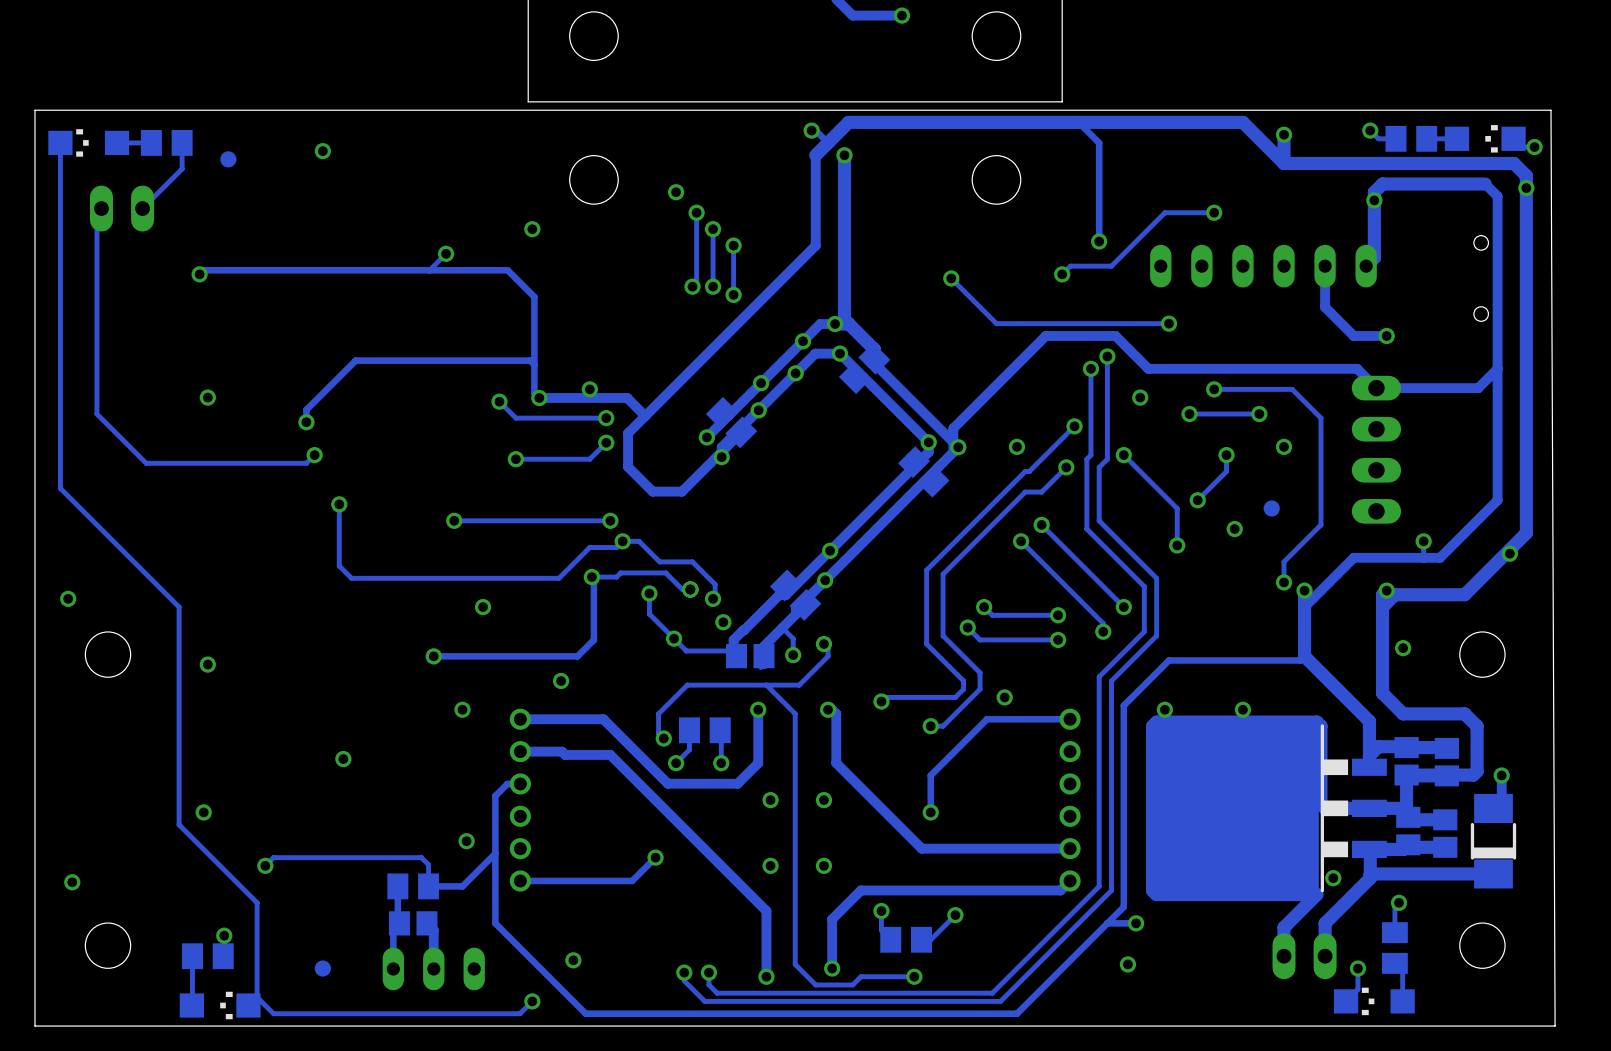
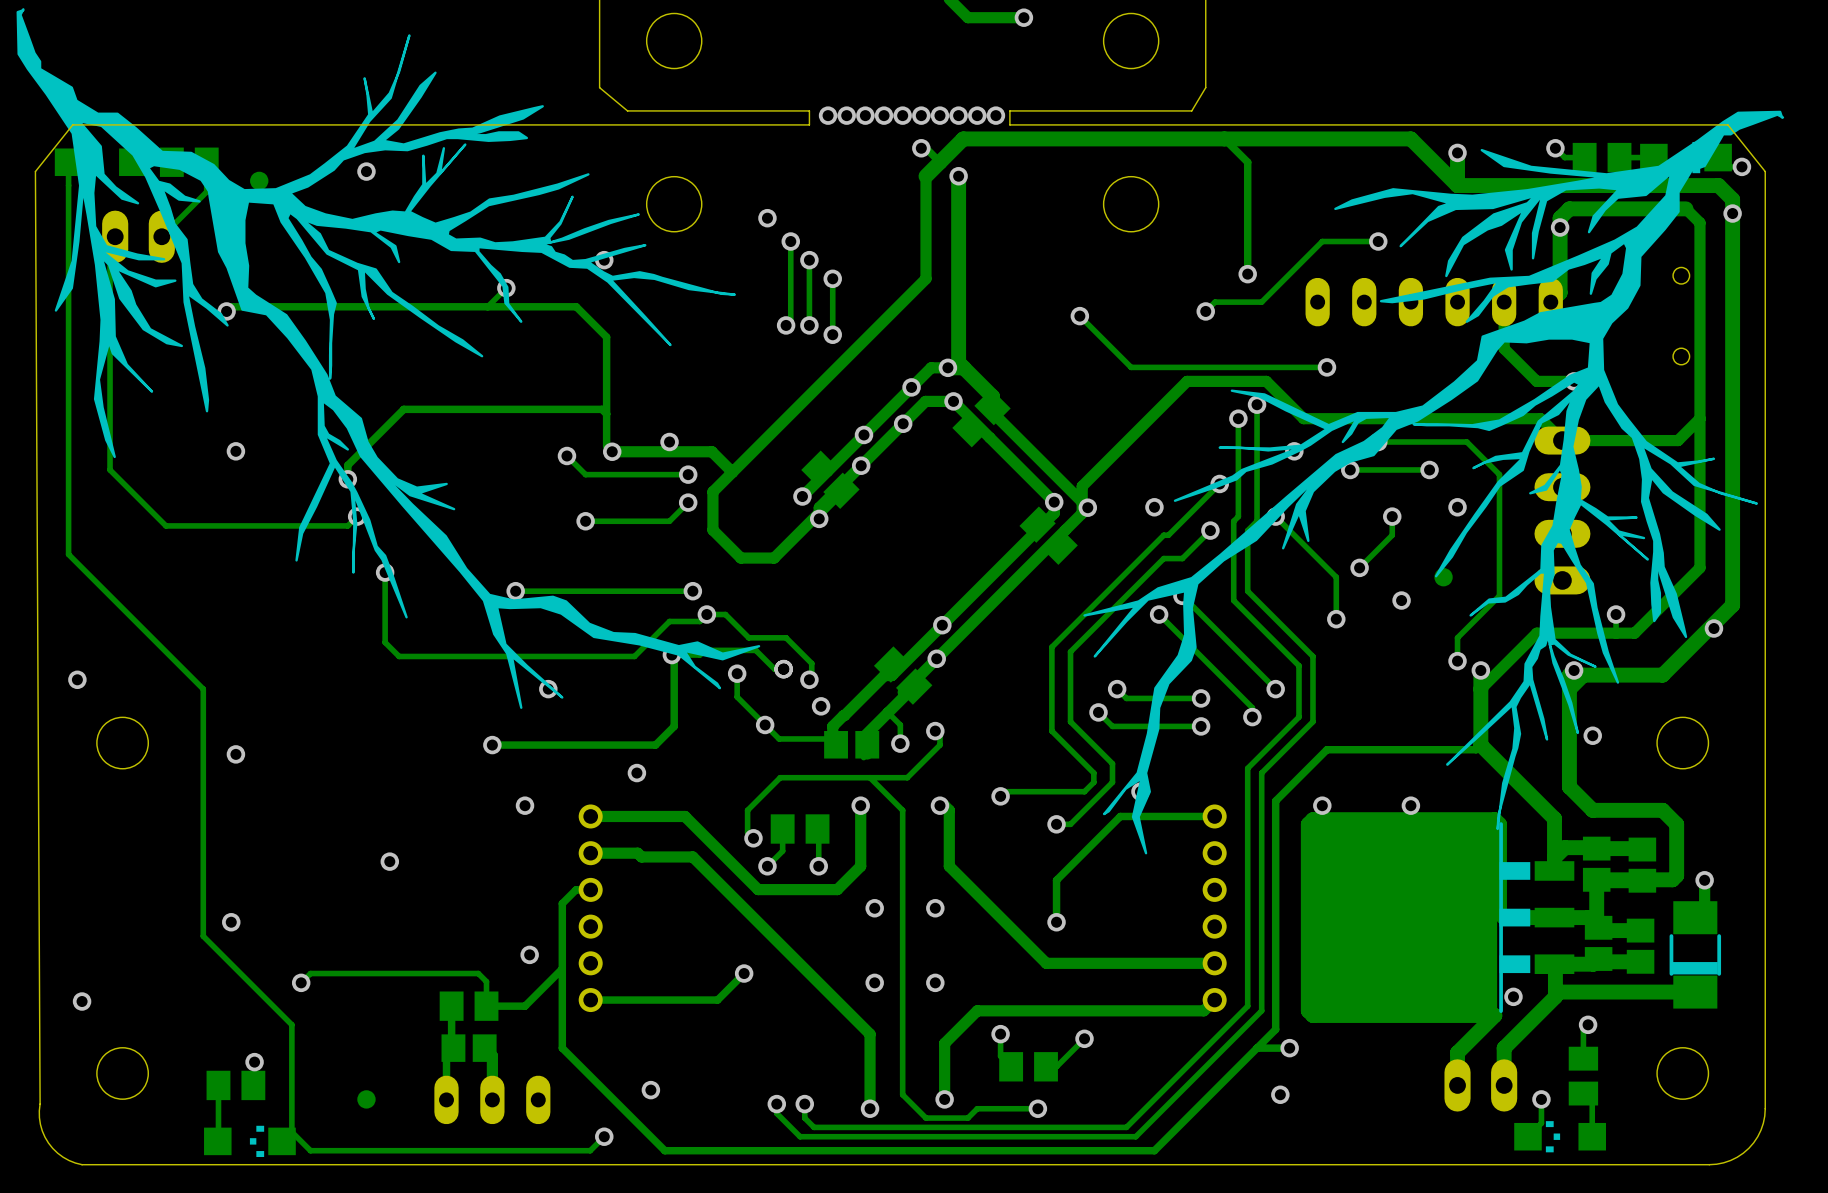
drawing: none -> [16, 8, 761, 709]
board edge: (1062, 77) (1062, 101) (528, 101) (528, 77) -> (1205, 87) (1191, 110) (1009, 110) (1009, 124) (1727, 124) (1765, 171) (1765, 1108) (1761, 1130) (1748, 1148) (1730, 1160) (1709, 1164)
drawing: none -> [1083, 110, 1785, 855]
via: none -> (828, 115)
via: none -> (846, 115)
via: none -> (865, 115)
via: none -> (884, 115)
via: none -> (902, 115)
via: none -> (921, 115)
via: none -> (939, 115)
via: none -> (958, 115)
via: none -> (977, 115)
via: none -> (995, 115)
board edge: (1505, 1026) (1555, 1026) (1550, 110) (35, 110) (35, 1026) (72, 1026) -> (599, 87) (627, 110) (809, 110) (809, 124) (72, 124) (35, 171) (39, 1117) (45, 1137) (52, 1148) (69, 1160) (82, 1164)

